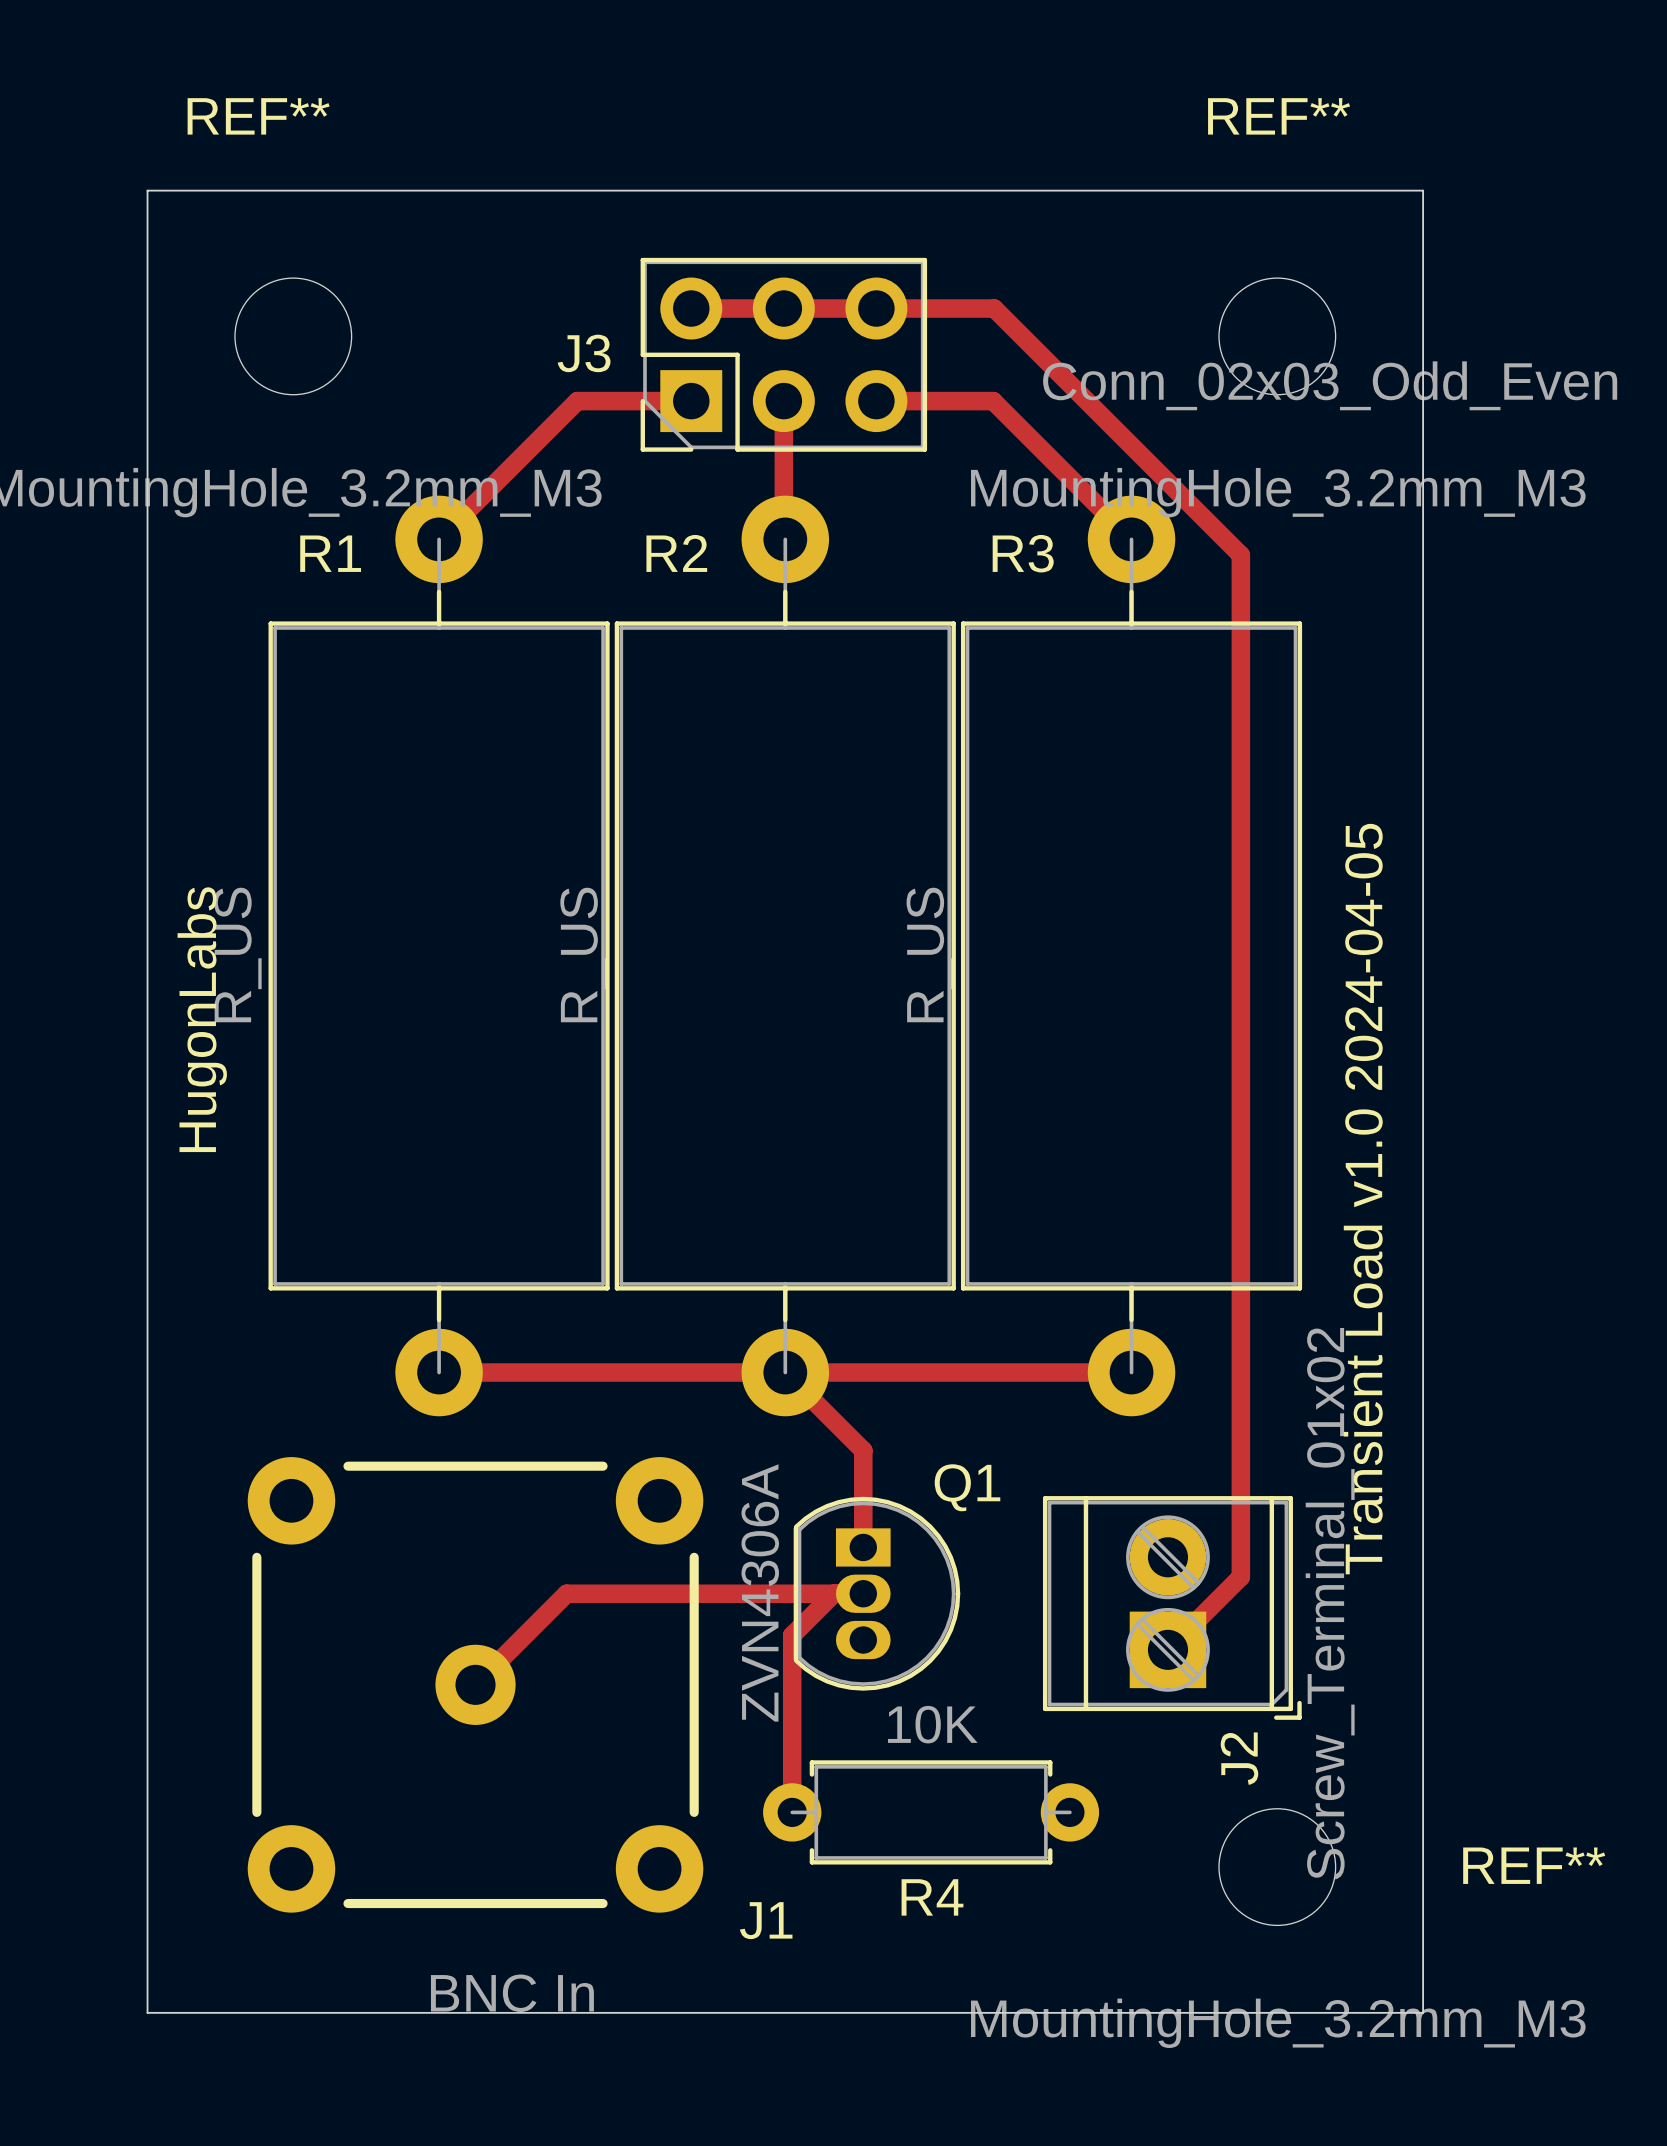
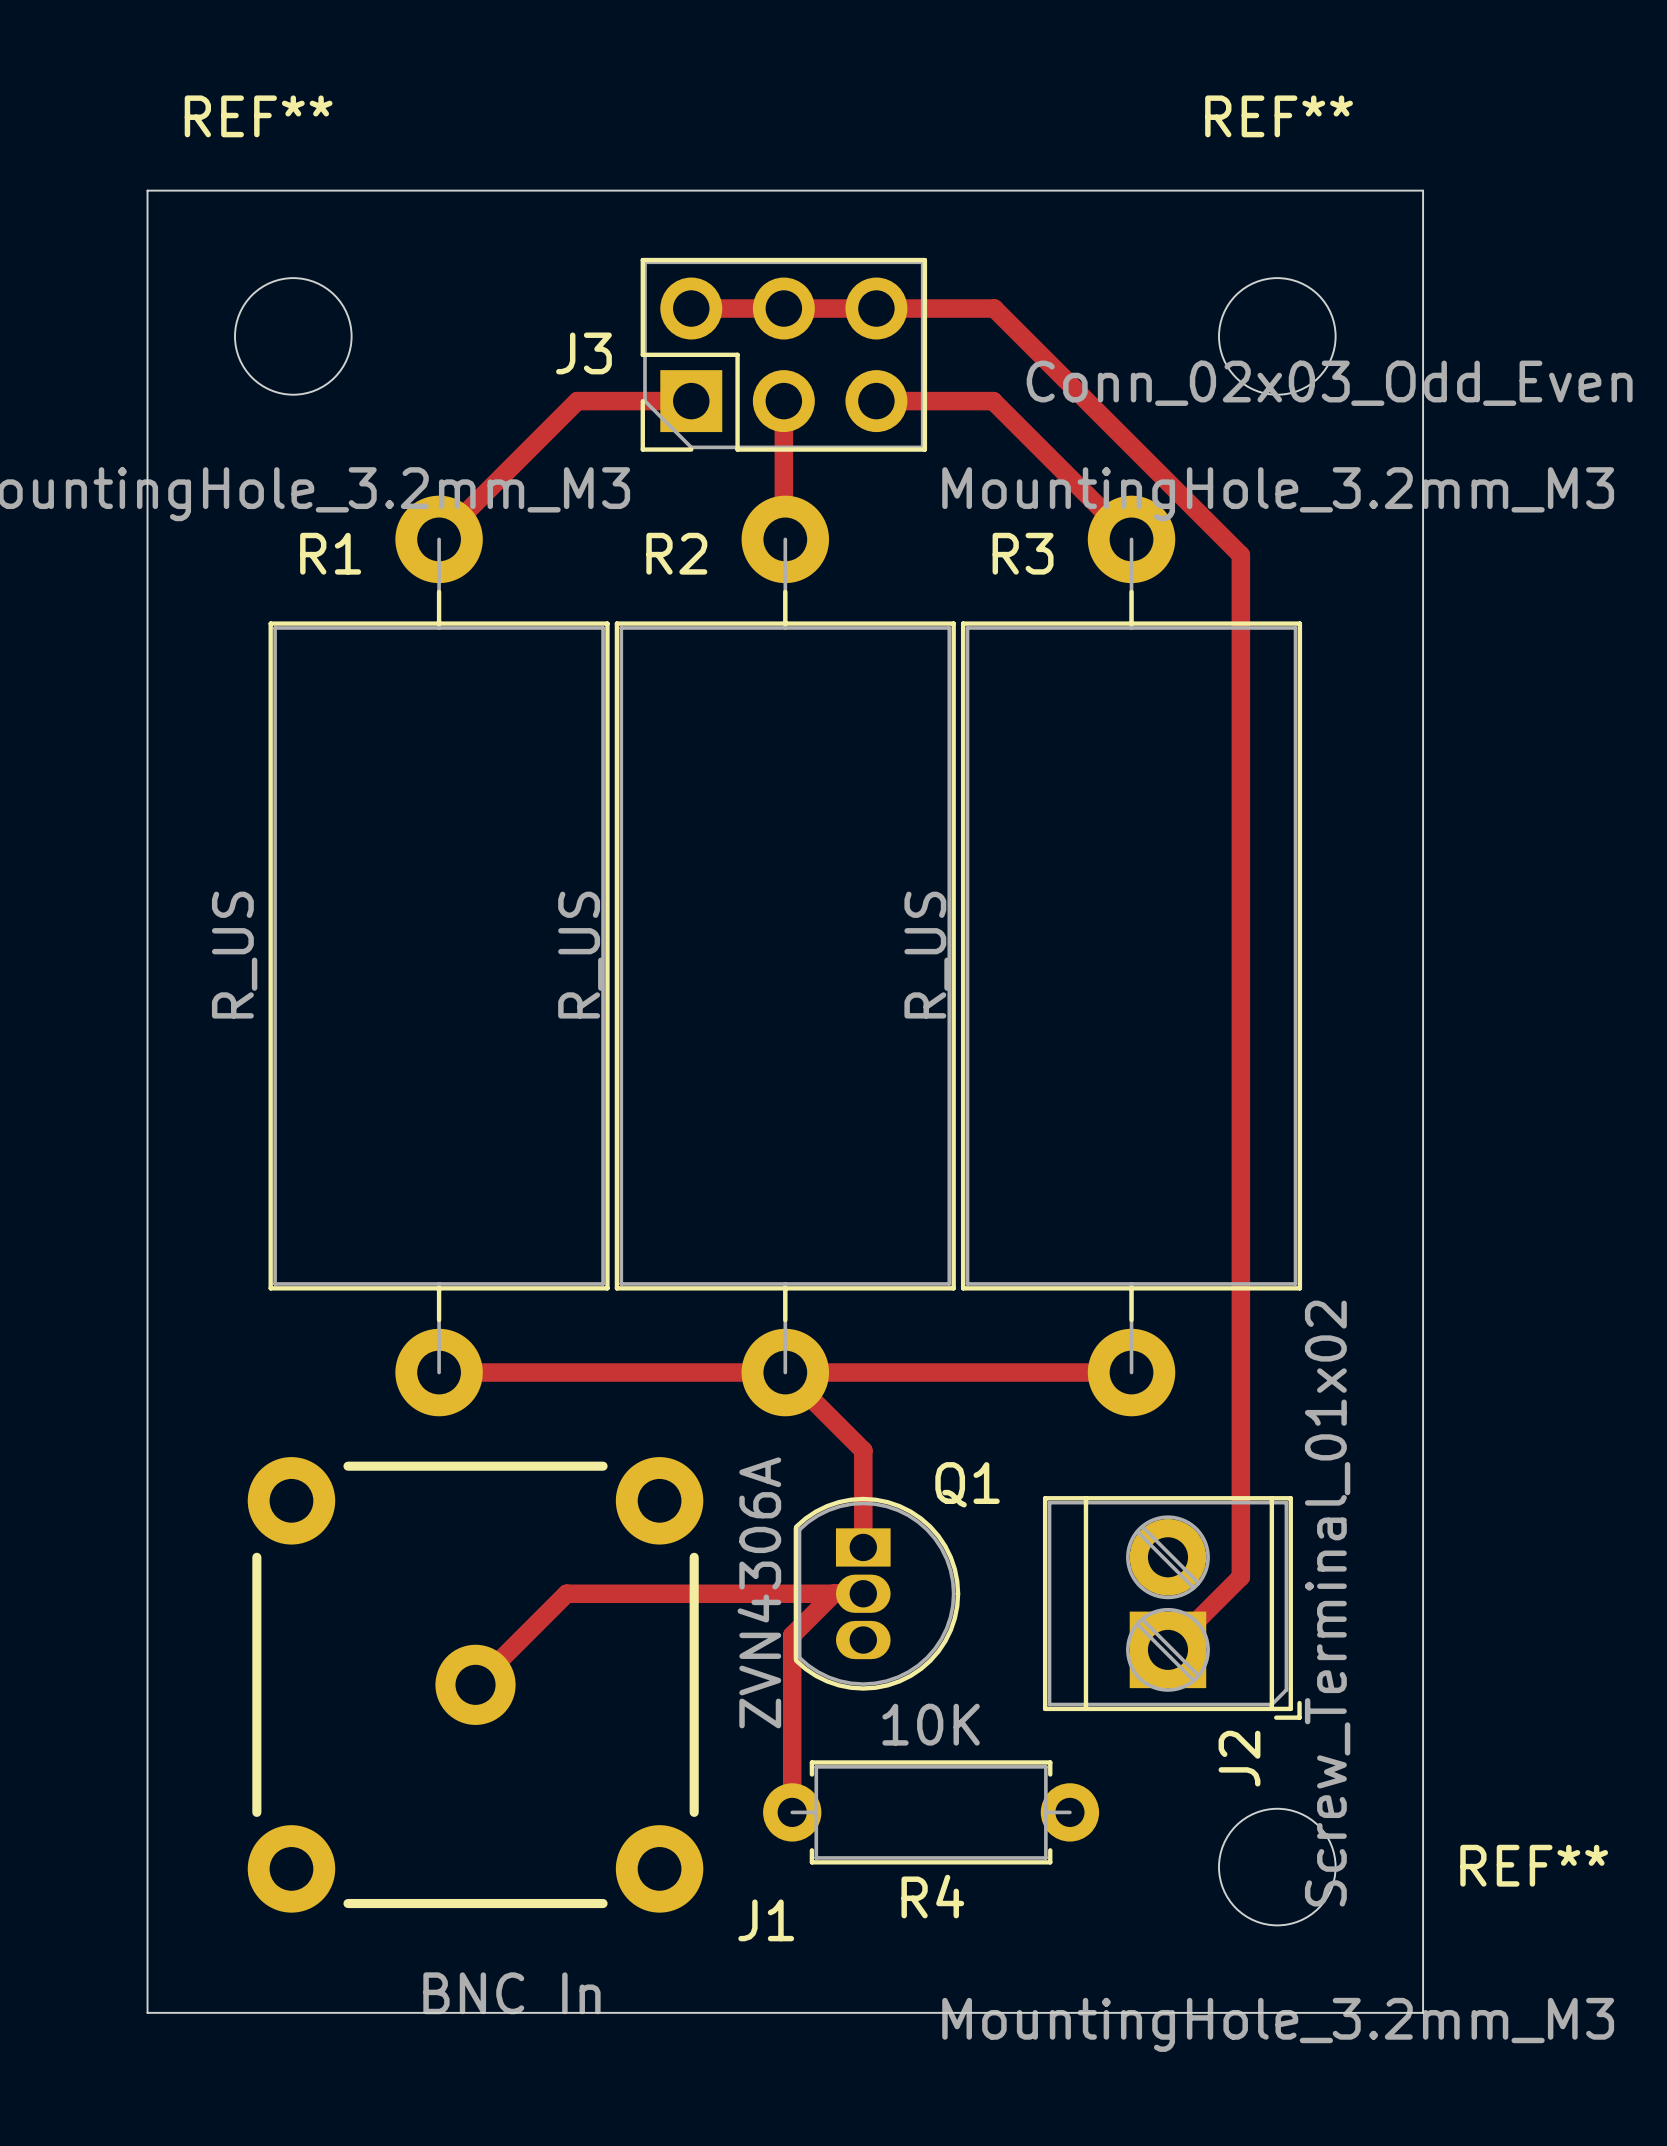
text: HugonLabs (202, 1019) -> none
text: Transient Load v1.0 2024-04-05 (1363, 1199) -> none

